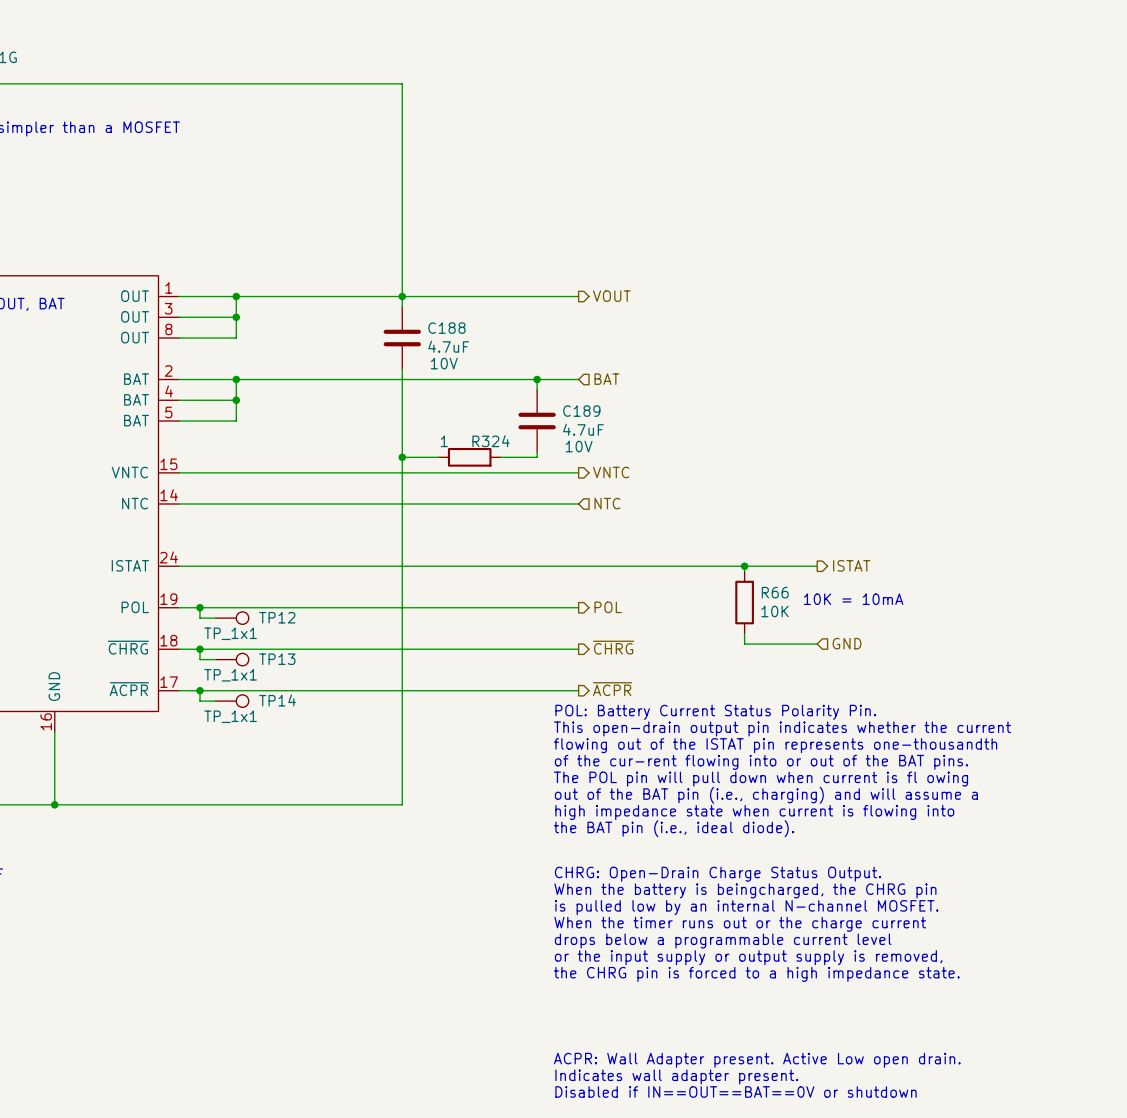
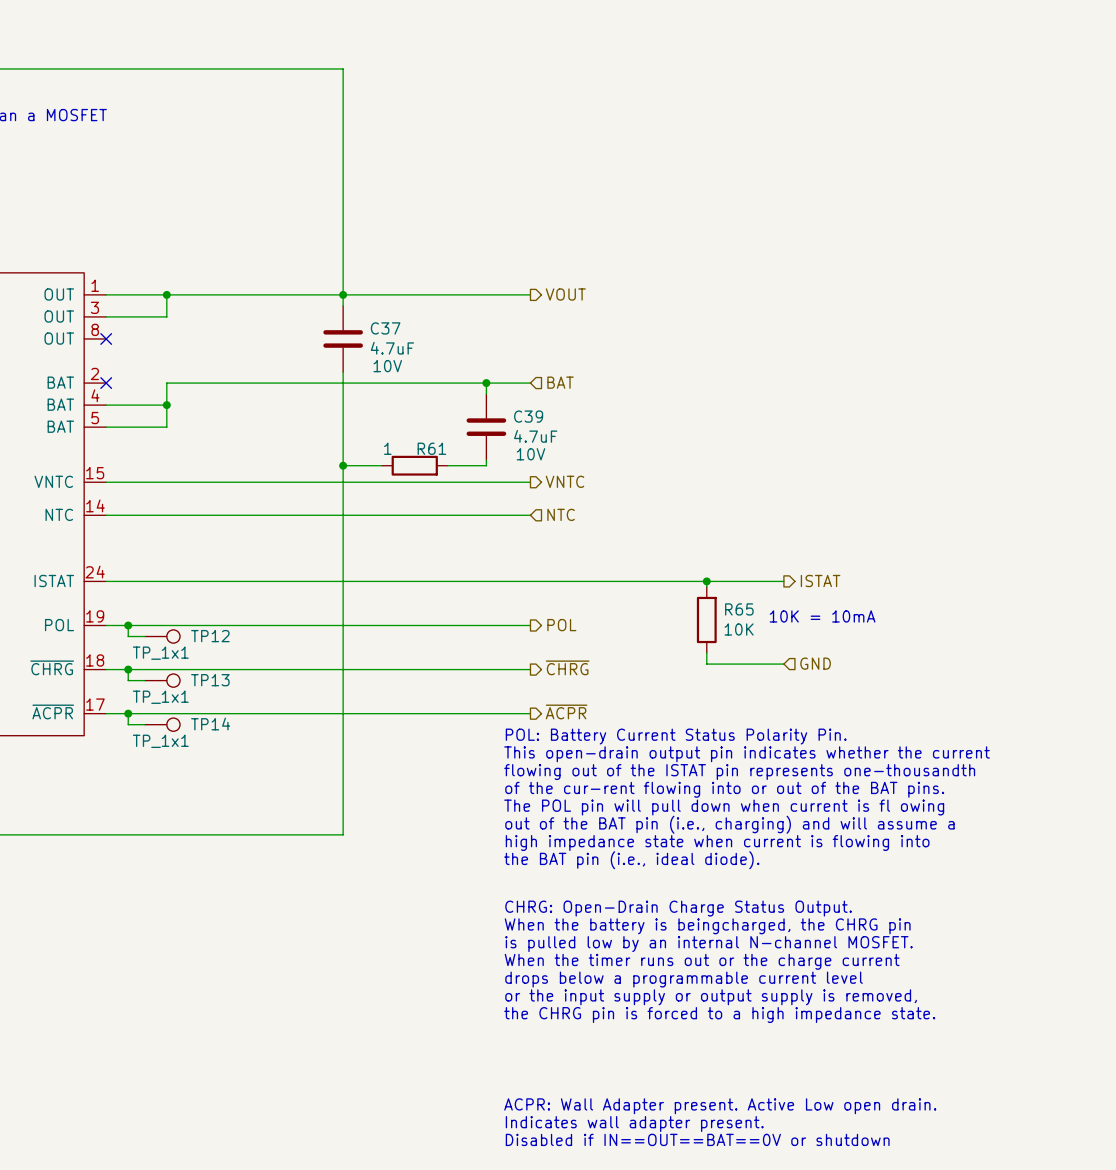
wire: (236, 317) (236, 338) (179, 338) -> none
junction: (236, 317) -> none
C188 name: C188 (446, 328) -> C37 (385, 328)
no-connect mark: none -> (106, 338)
wire: (179, 379) (236, 379) -> none
no-connect mark: none -> (106, 383)
junction: (236, 379) -> none
C189 name: C189 (581, 411) -> C39 (528, 416)
R324 name: R324 (491, 441) -> R61 (431, 448)
R66 name: R66 (775, 592) -> R65 (739, 609)

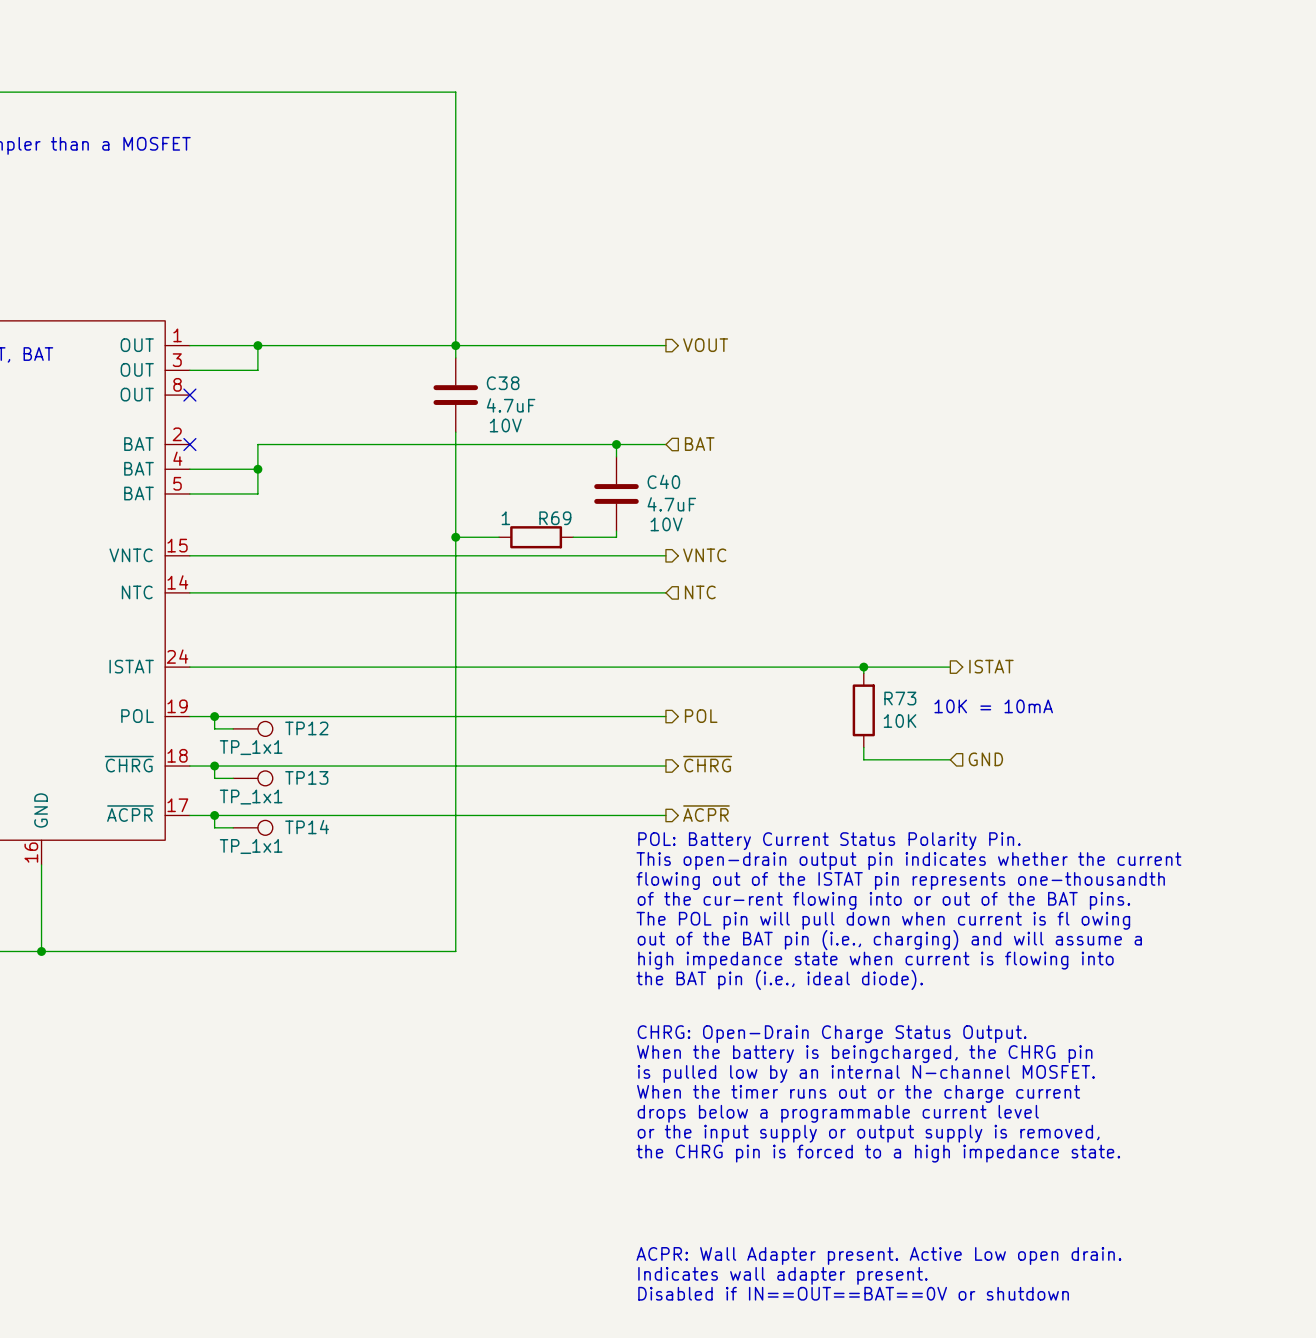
C37 name: C37 (385, 328) -> C38 (503, 383)
C39 name: C39 (528, 416) -> C40 (663, 481)
R61 name: R61 (431, 448) -> R69 (555, 518)
R65 name: R65 (739, 609) -> R73 (900, 698)

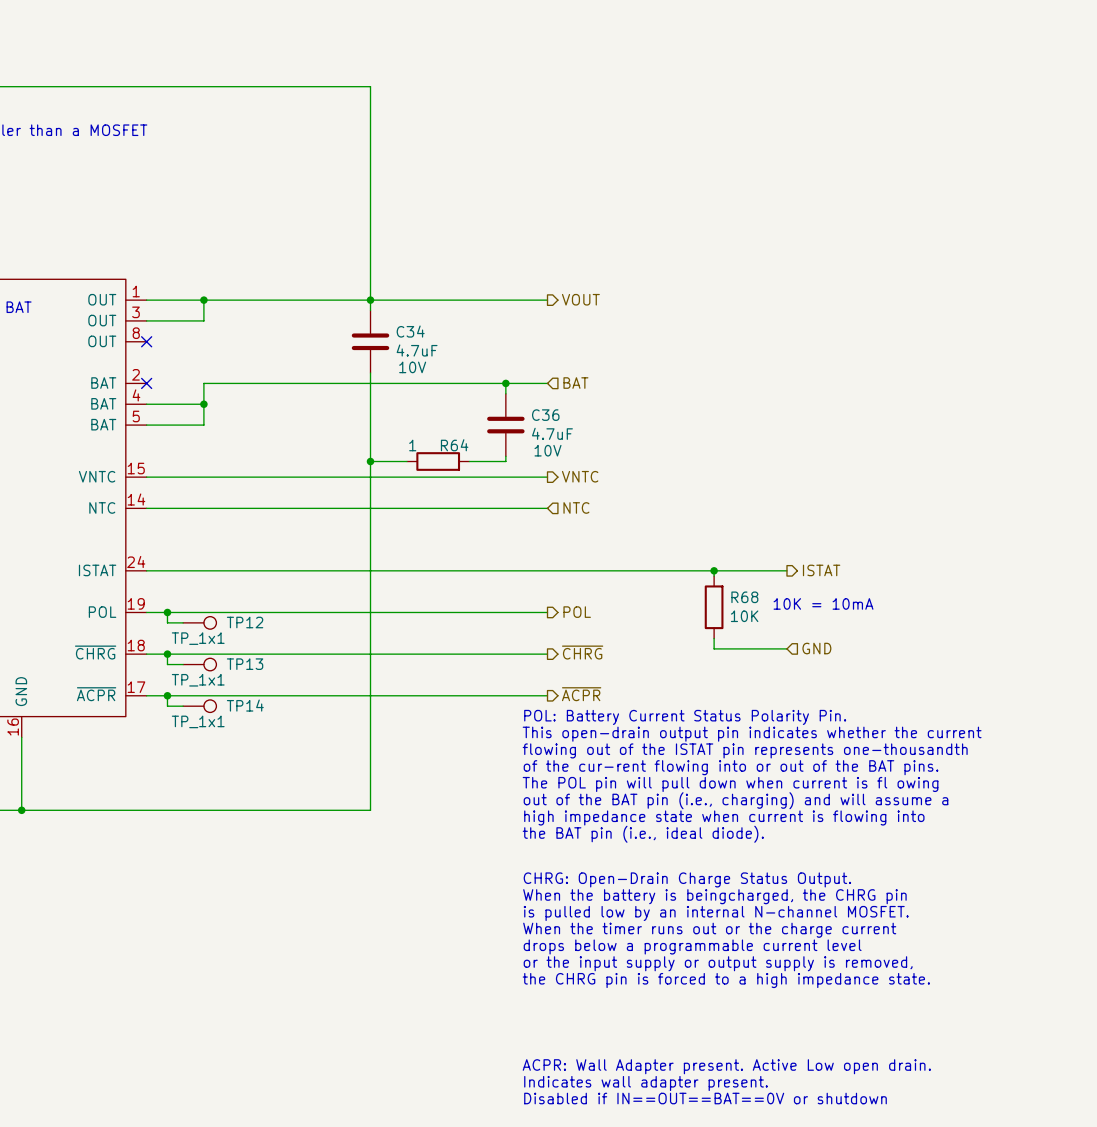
C38 name: C38 (503, 383) -> C34 (410, 331)
C40 name: C40 (663, 481) -> C36 (545, 415)
R69 name: R69 (555, 518) -> R64 (454, 445)
R73 name: R73 (900, 698) -> R68 (744, 597)

